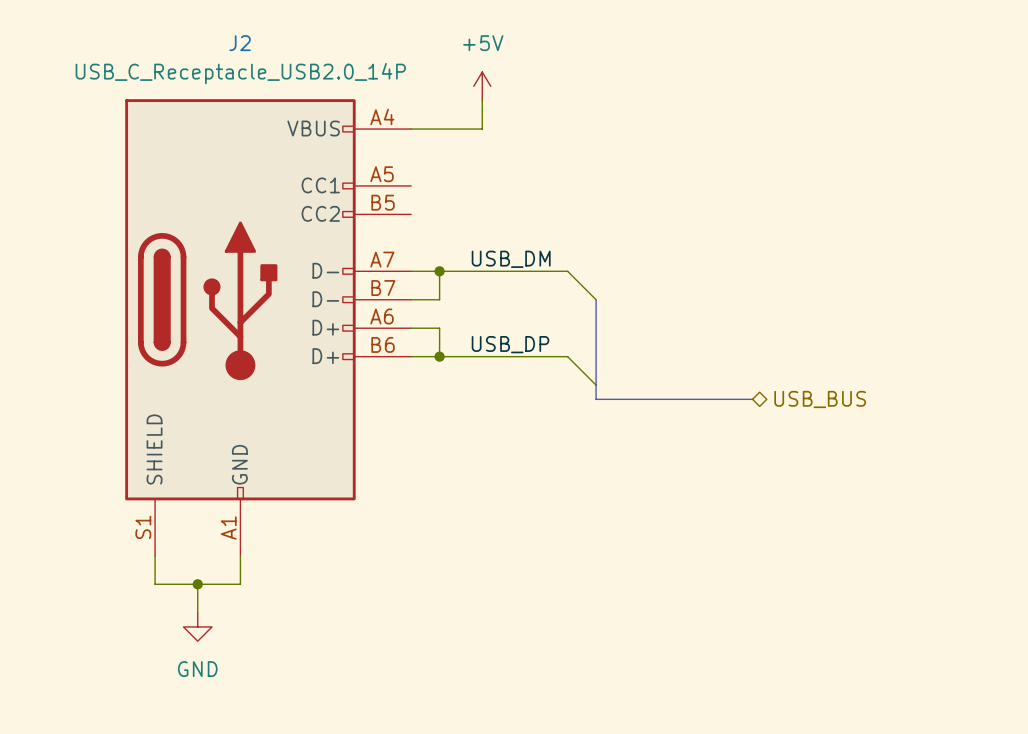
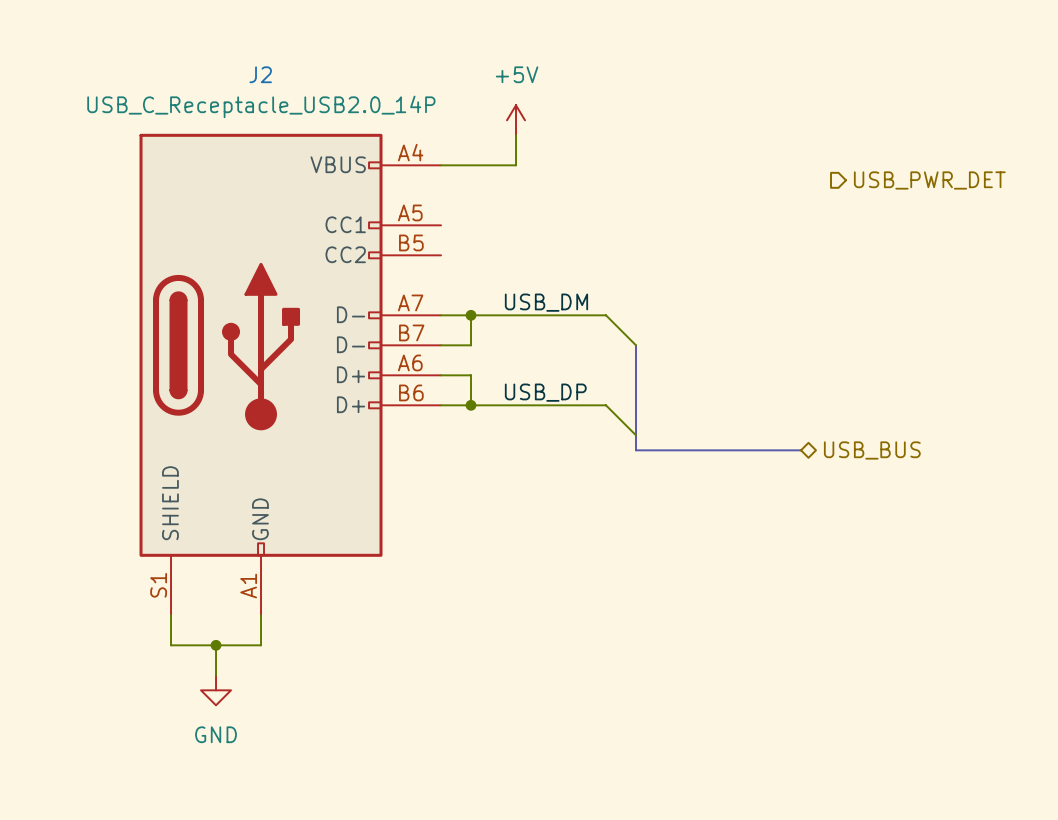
hierarchical label: none -> USB_PWR_DET (929, 180)

